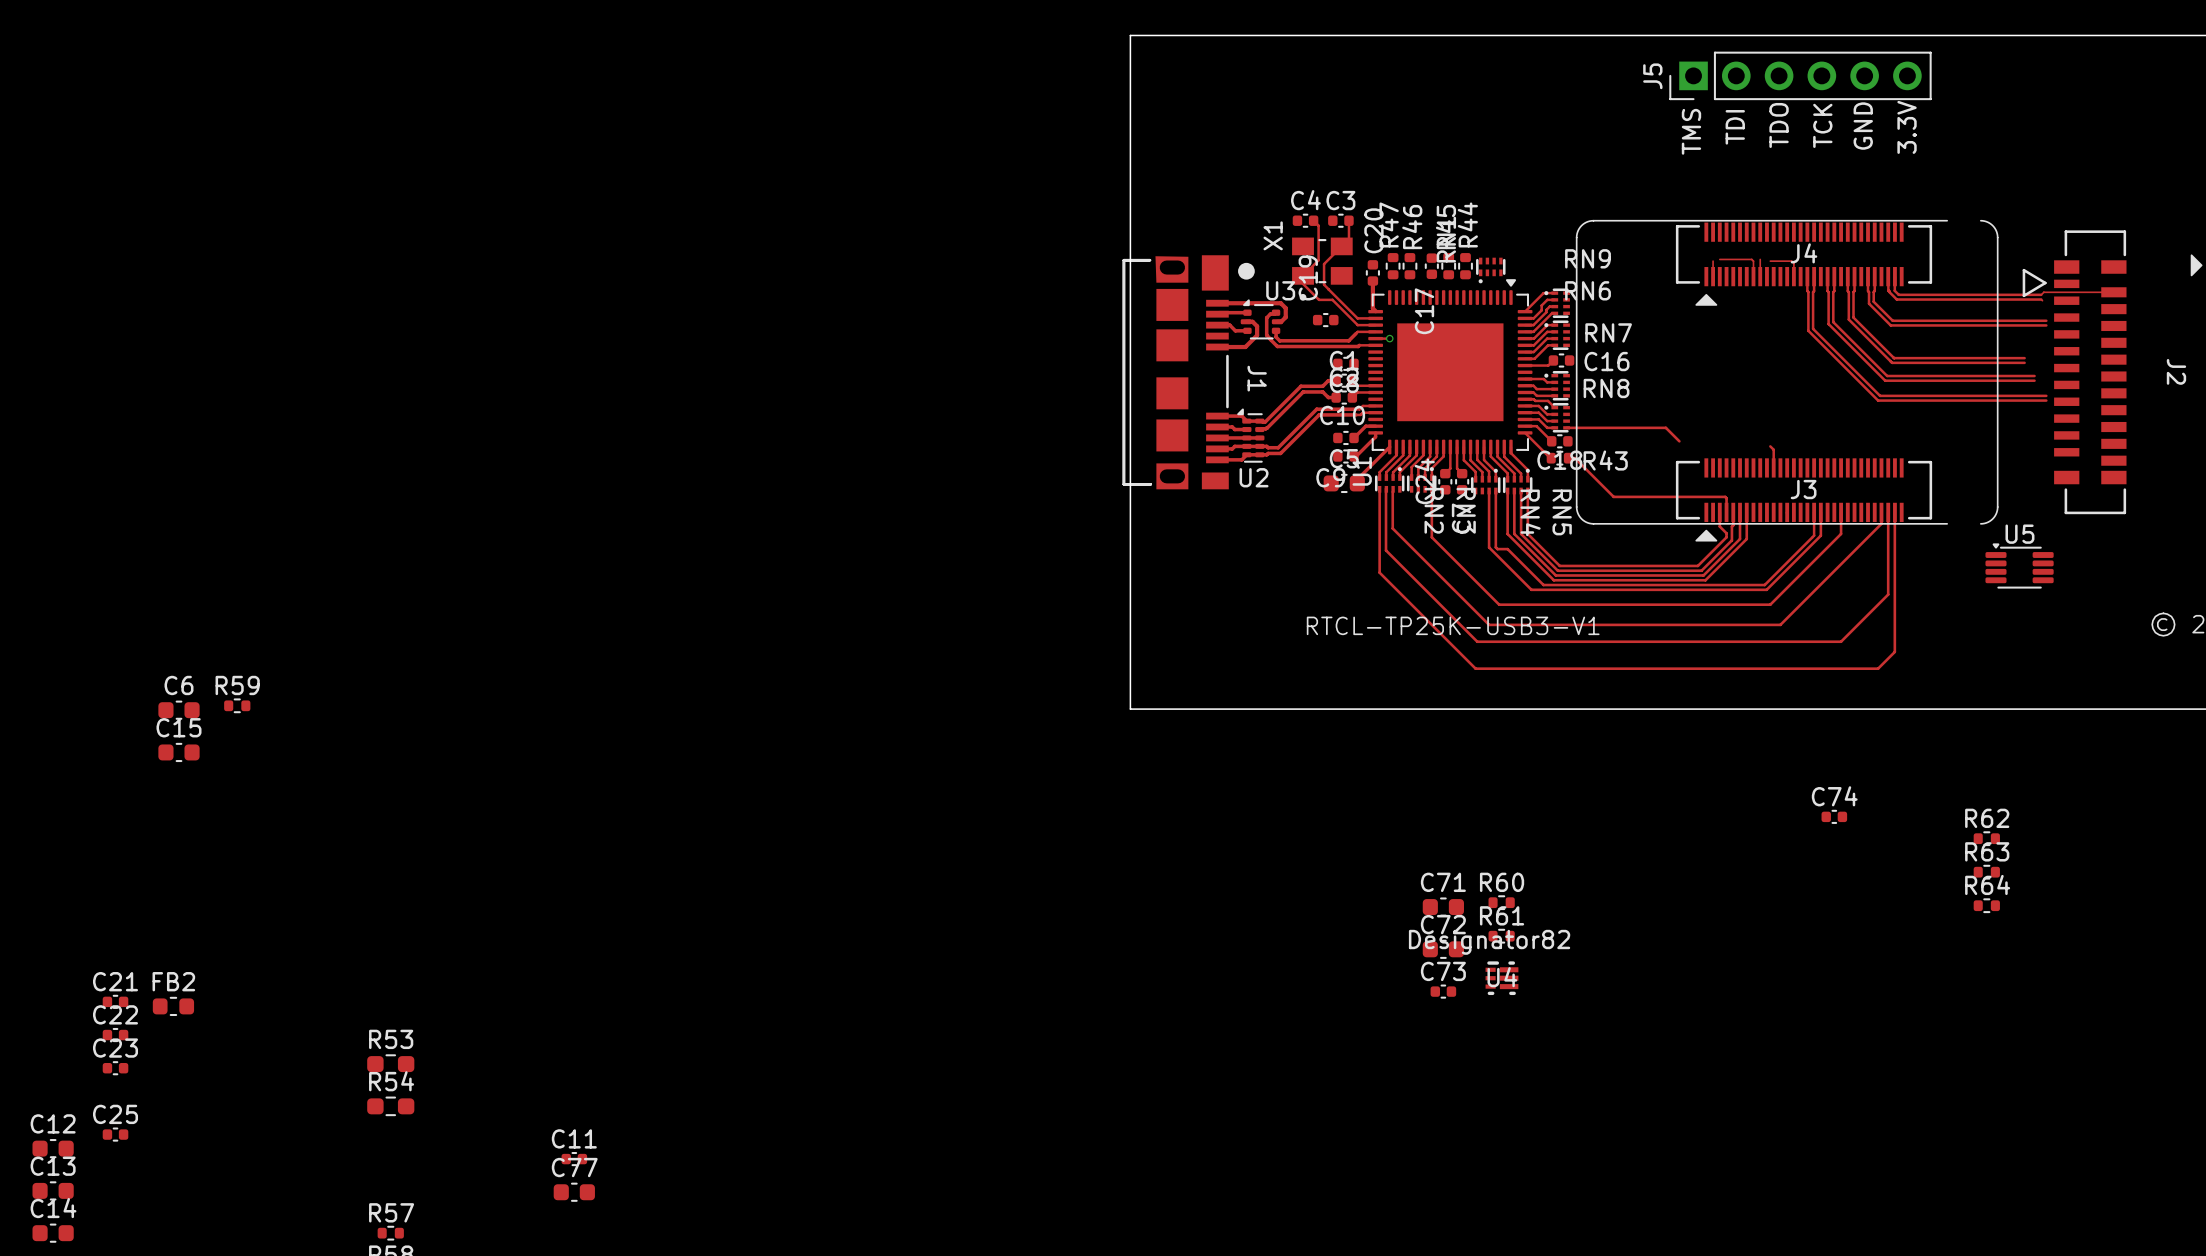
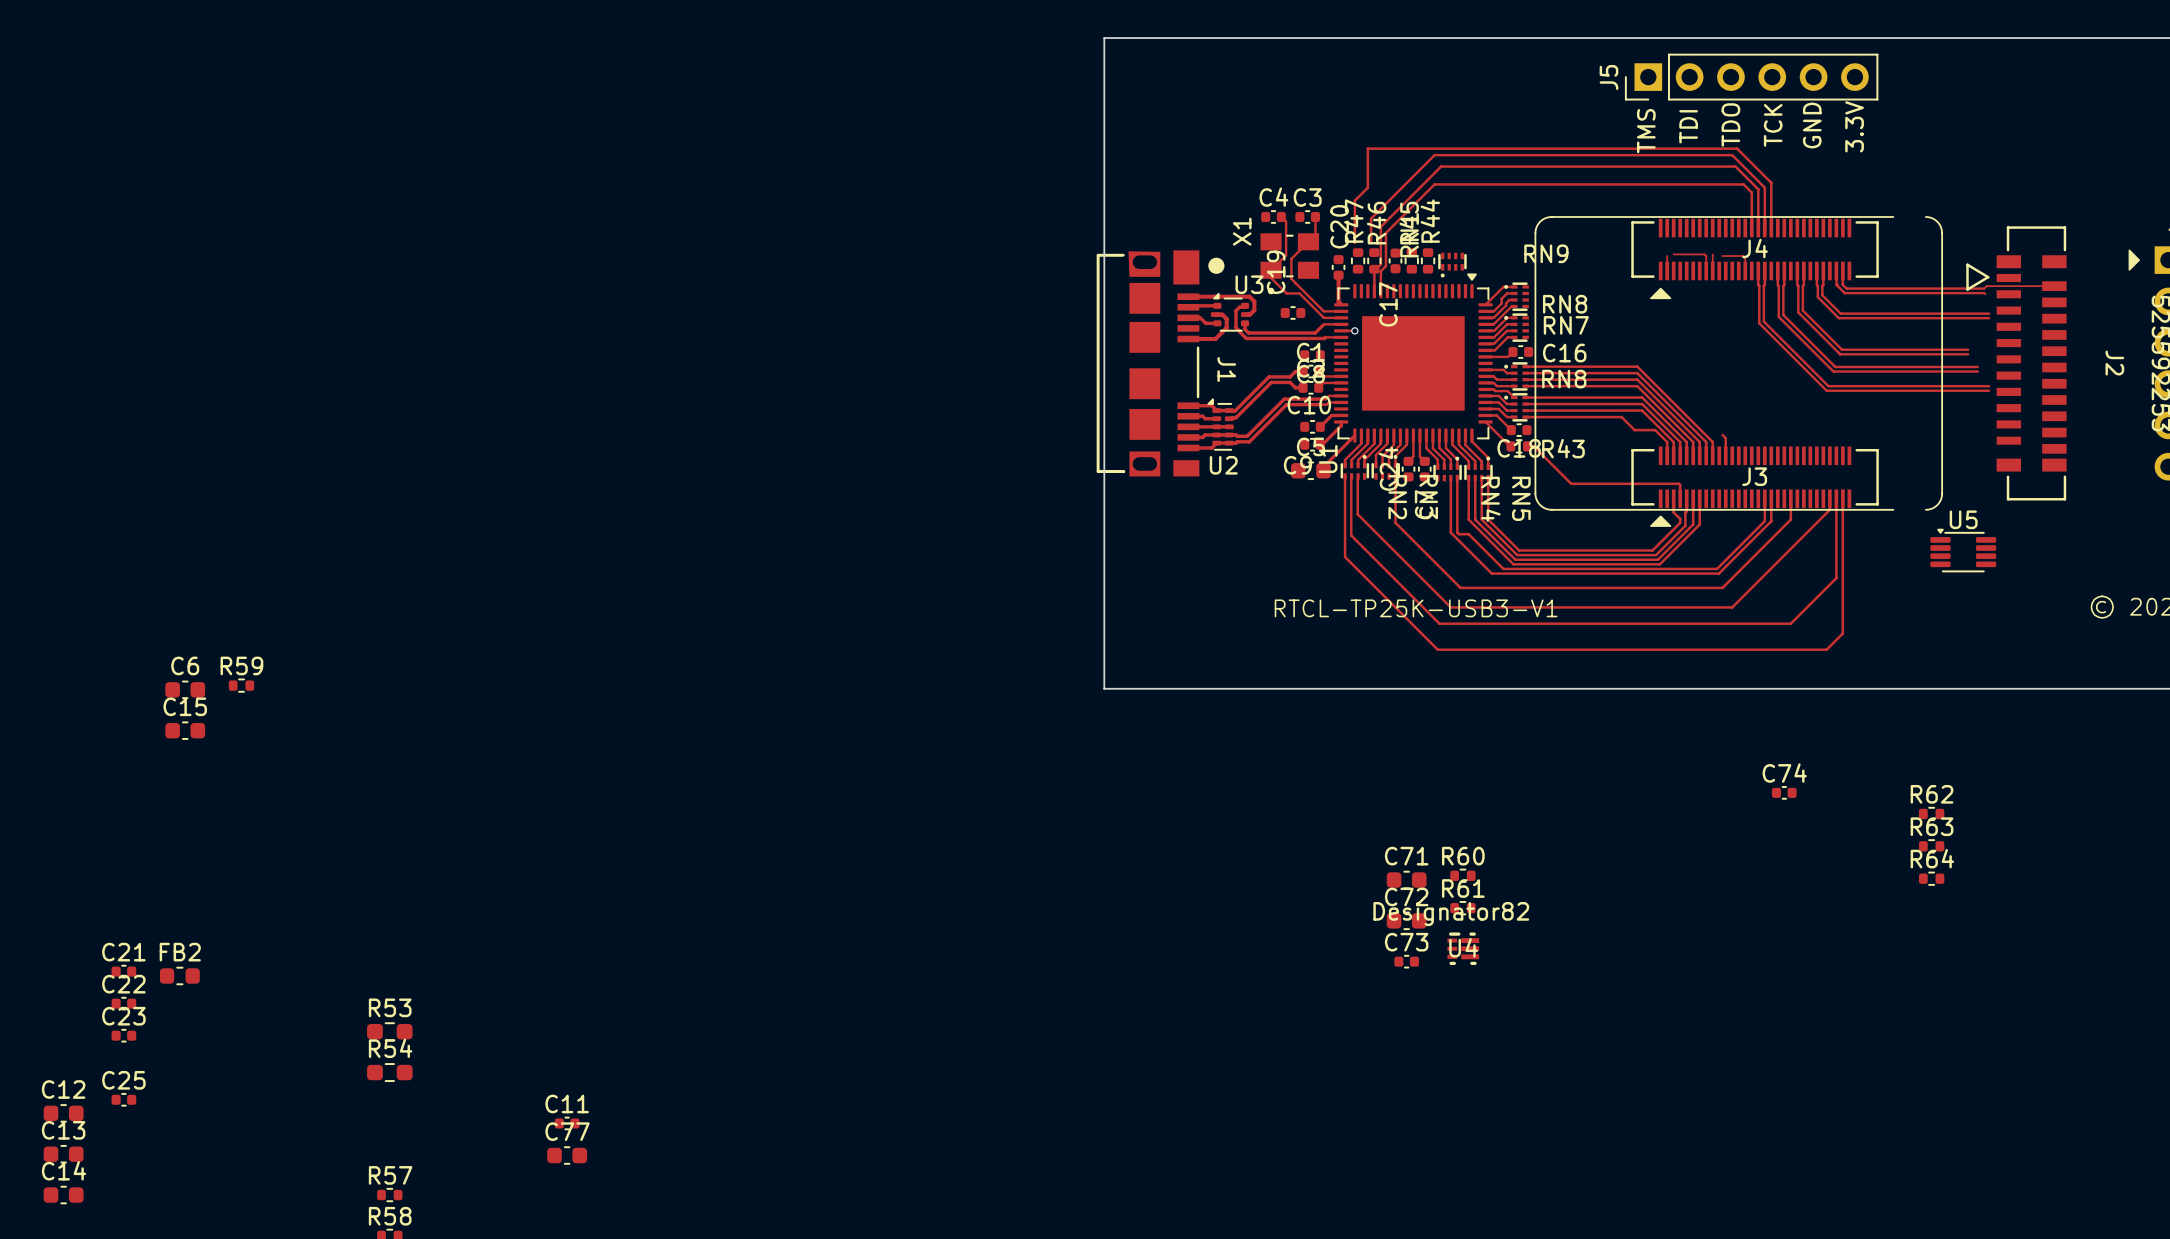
track: none -> (1751, 228) (1751, 192) (1743, 184) (1434, 184) (1385, 233) (1385, 266) (1380, 271) (1380, 291)
track: none -> (1758, 228) (1758, 189) (1735, 166) (1441, 166) (1380, 226) (1380, 264) (1374, 271) (1374, 291)
track: none -> (1764, 228) (1764, 187) (1732, 155) (1434, 155) (1371, 218) (1371, 243)
track: none -> (1771, 228) (1771, 182) (1737, 148) (1367, 148) (1367, 187) (1354, 200) (1354, 243)
RN6 name: RN6 (1588, 290) -> RN8 (1565, 304)
track: none -> (1525, 366) (1637, 366) (1712, 442) (1712, 455)
track: none -> (1525, 373) (1637, 373) (1706, 442) (1706, 455)
track: none -> (1525, 379) (1637, 379) (1699, 442) (1699, 455)
track: none -> (1525, 386) (1637, 386) (1693, 442) (1693, 455)
track: none -> (1525, 397) (1642, 397) (1686, 442) (1686, 455)
track: none -> (1525, 404) (1642, 404) (1680, 442) (1680, 455)
track: none -> (1525, 410) (1642, 410) (1673, 442) (1673, 455)
track: none -> (1634, 430) (1655, 430) (1667, 442) (1667, 455)

